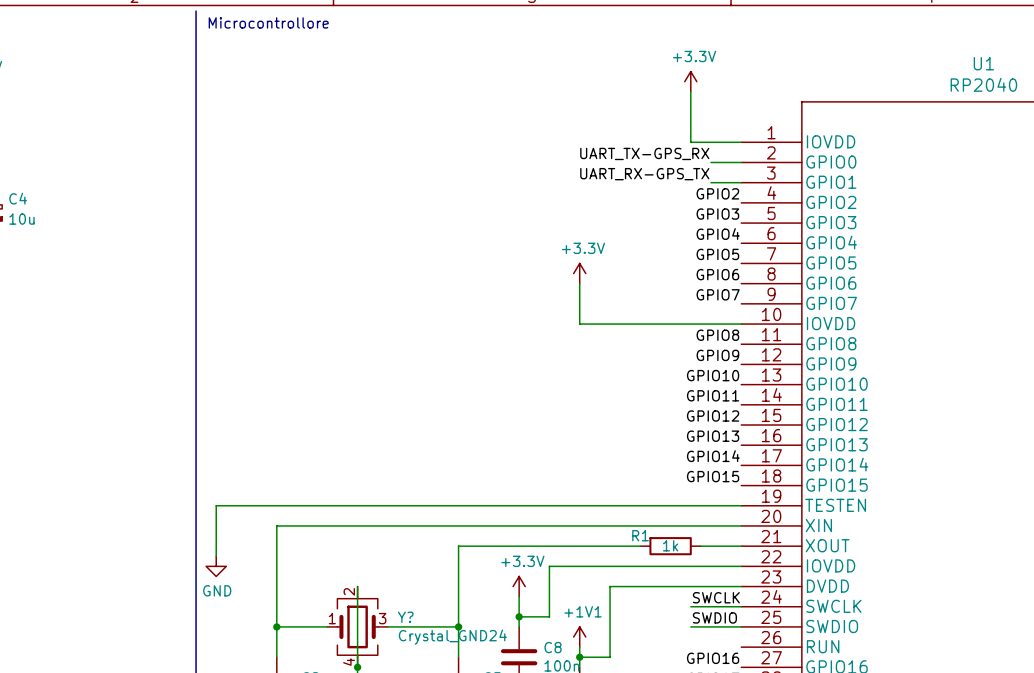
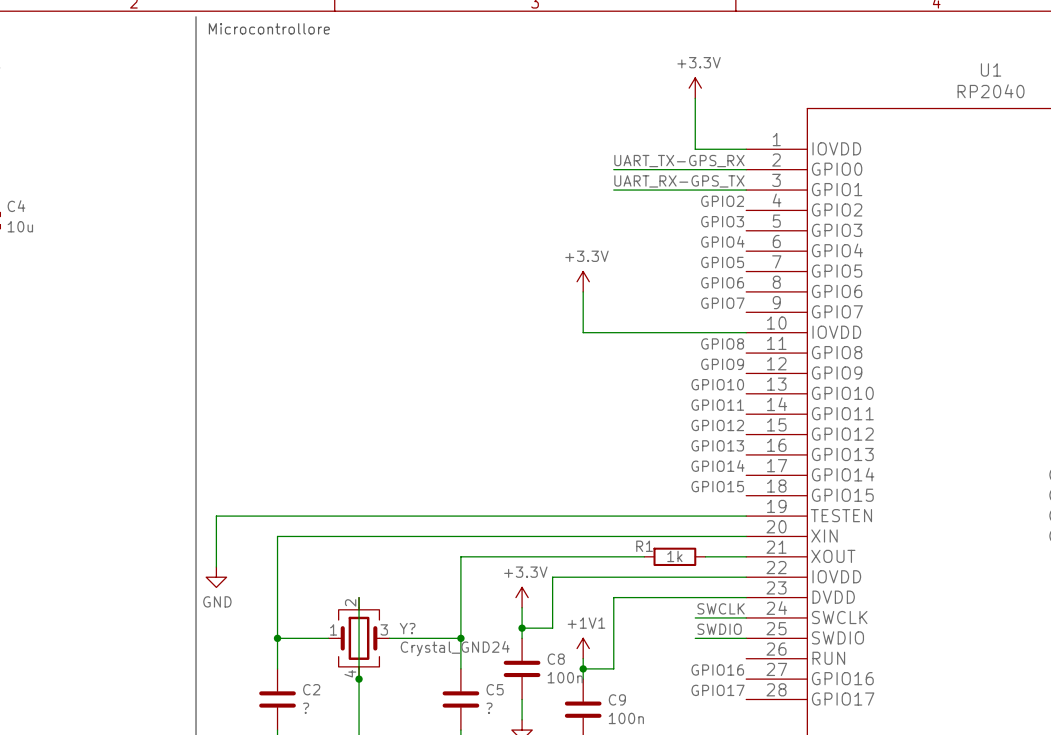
label position: UART_TX-GPS_RX (644, 153) -> UART_TX-GPS_RX (679, 161)
wire: none -> (613, 169) (715, 169)
label position: UART_RX-GPS_TX (644, 174) -> UART_RX-GPS_TX (679, 181)
wire: none -> (613, 190) (715, 190)

